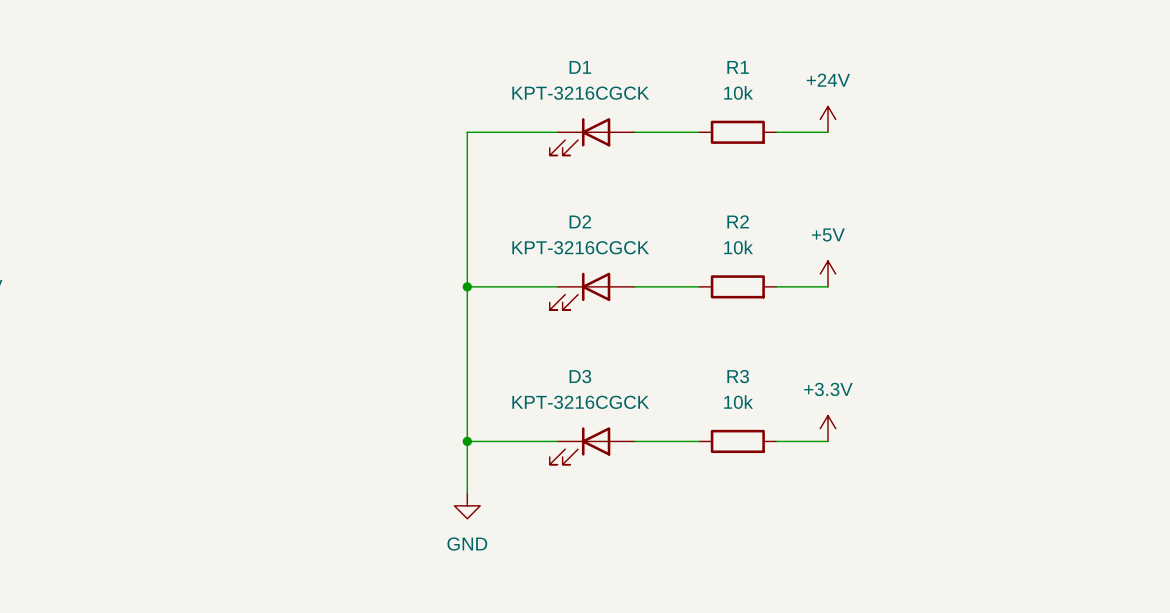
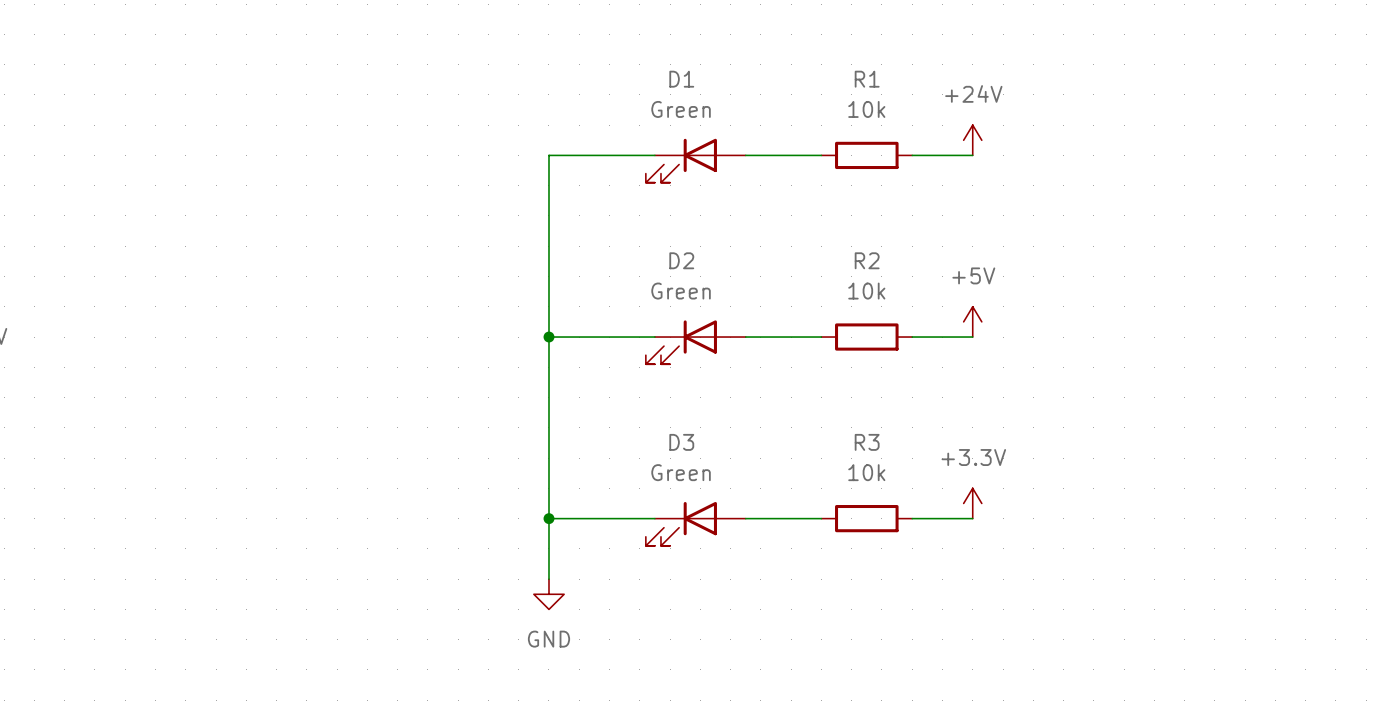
D1 value: KPT-3216CGCK (580, 93) -> Green (681, 109)
D2 value: KPT-3216CGCK (580, 247) -> Green (681, 291)
D3 value: KPT-3216CGCK (580, 402) -> Green (681, 472)

